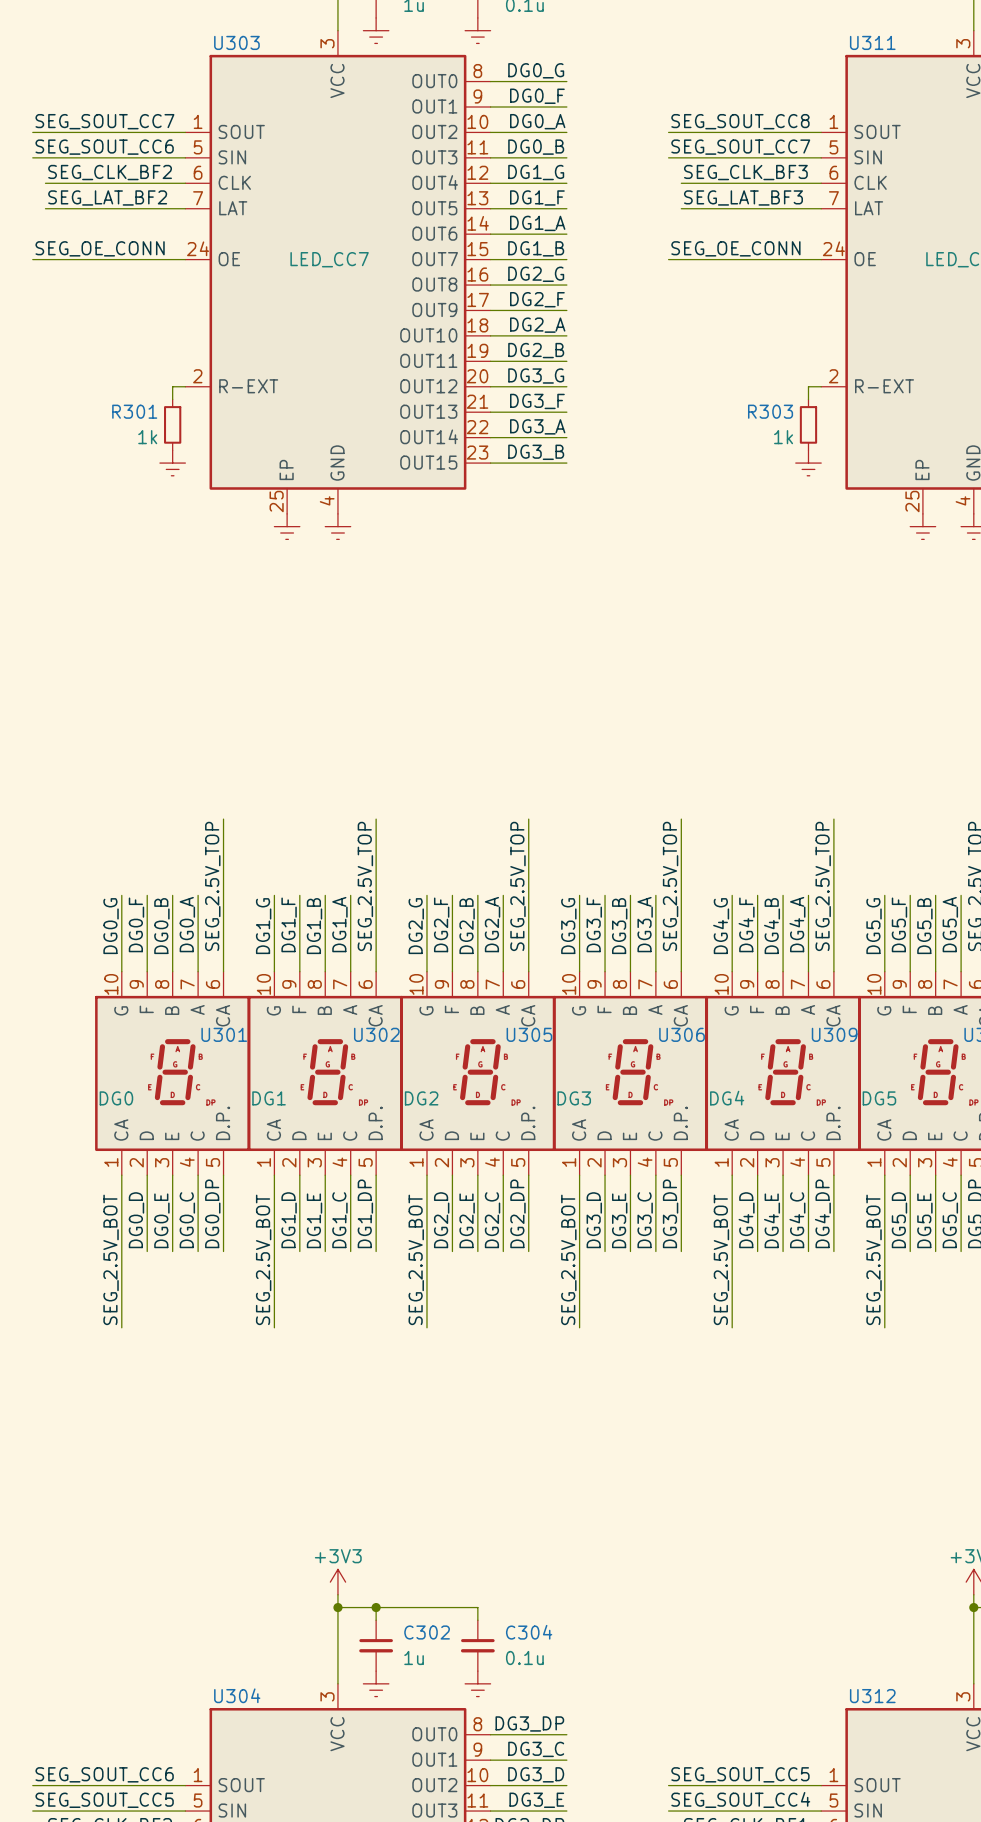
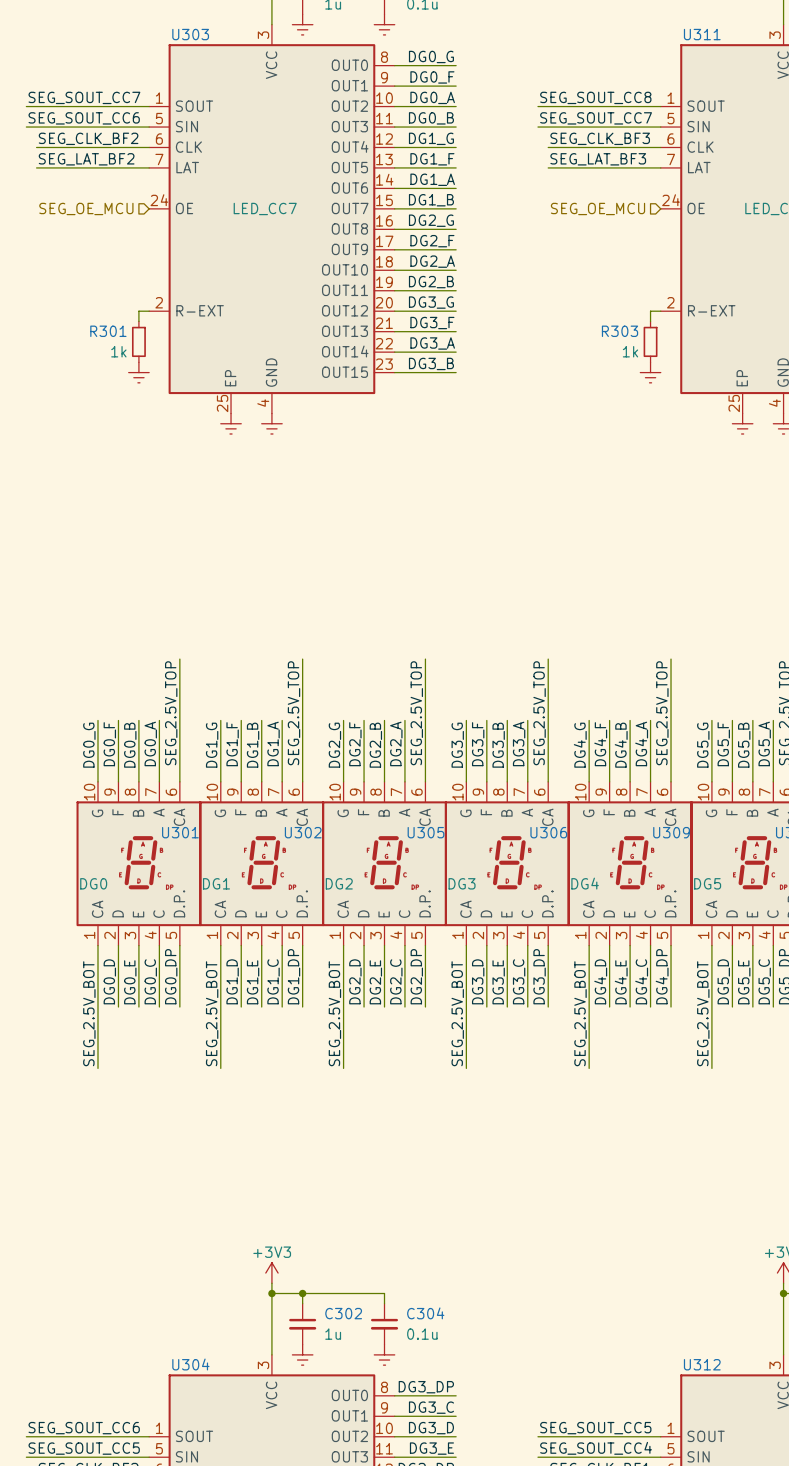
label: SEG_OE_CONN (100, 248) -> none
label: SEG_OE_CONN (735, 248) -> none
wire: (32, 259) (185, 259) -> none
hierarchical label: none -> SEG_OE_MCU (86, 208)
wire: (668, 259) (821, 259) -> none
hierarchical label: none -> SEG_OE_MCU (598, 208)

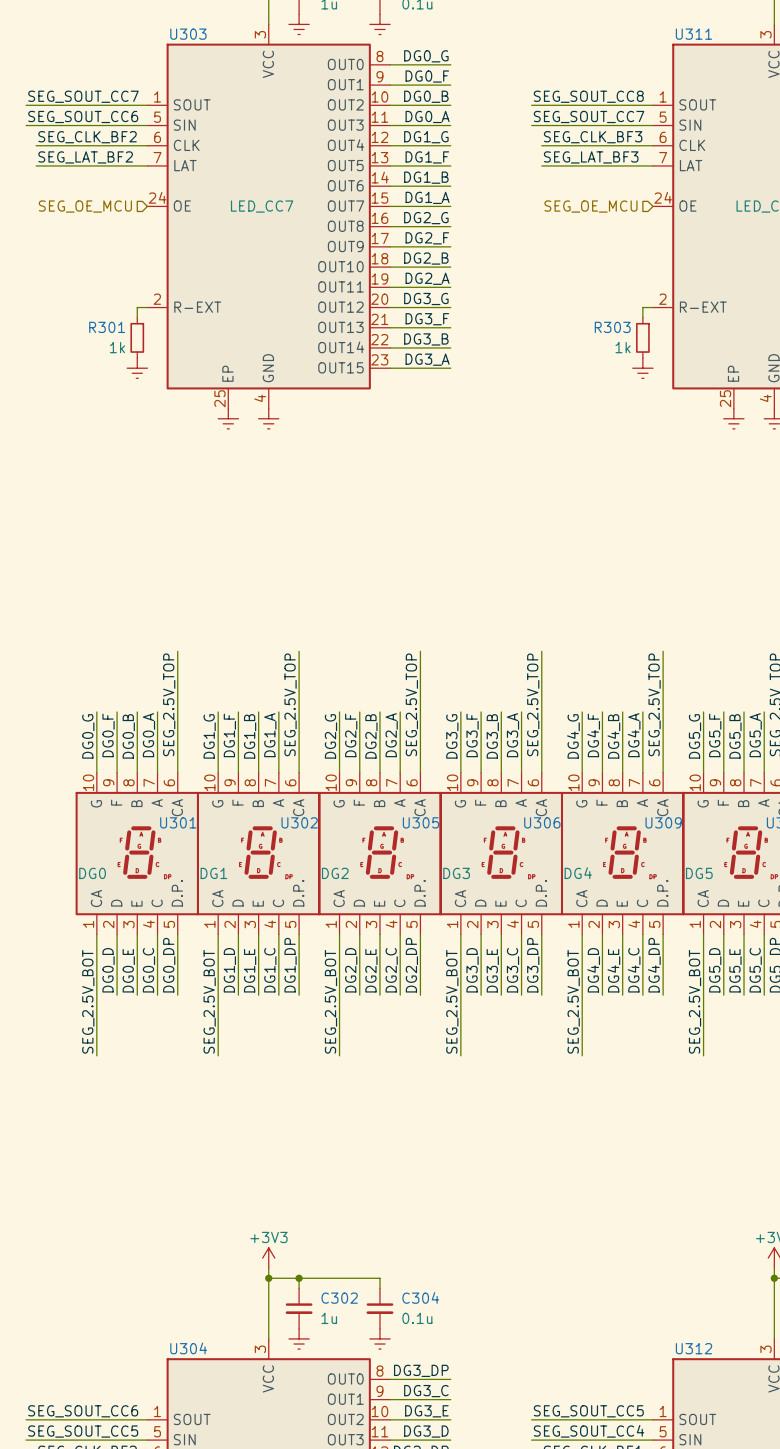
label: DG0_A (432, 97) -> DG0_B (426, 96)
label: DG0_B (431, 118) -> DG0_A (427, 116)
label: DG1_A (432, 179) -> DG1_B (426, 177)
label: DG1_B (431, 200) -> DG1_A (427, 197)
label: DG2_A (432, 261) -> DG2_B (426, 258)
label: DG2_B (431, 282) -> DG2_A (427, 278)
label: DG3_A (432, 343) -> DG3_B (426, 339)
label: DG3_B (431, 363) -> DG3_A (427, 359)
label: DG3_D (431, 1428) -> DG3_E (426, 1411)
label: DG3_E (431, 1448) -> DG3_D (426, 1431)

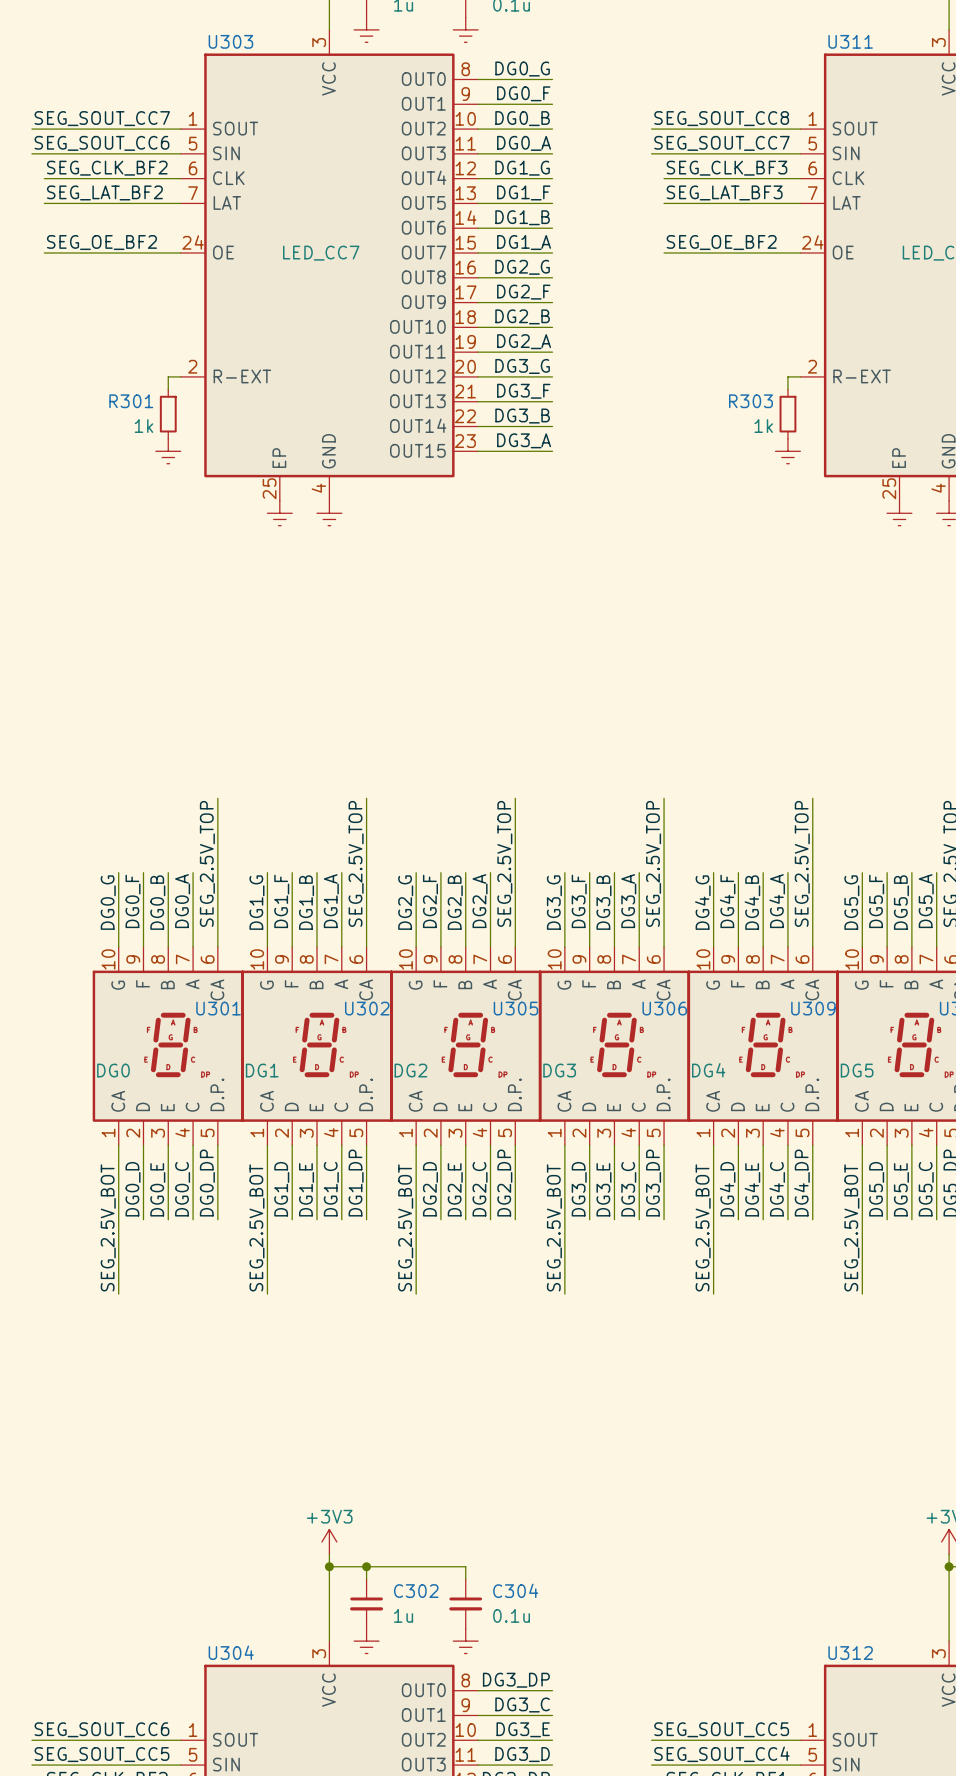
label: none -> SEG_OE_BF2 (101, 242)
label: none -> SEG_OE_BF2 (721, 242)
wire: none -> (44, 253) (180, 253)
hierarchical label: SEG_OE_MCU (85, 206) -> none
wire: none -> (664, 253) (800, 253)
hierarchical label: SEG_OE_MCU (590, 206) -> none

